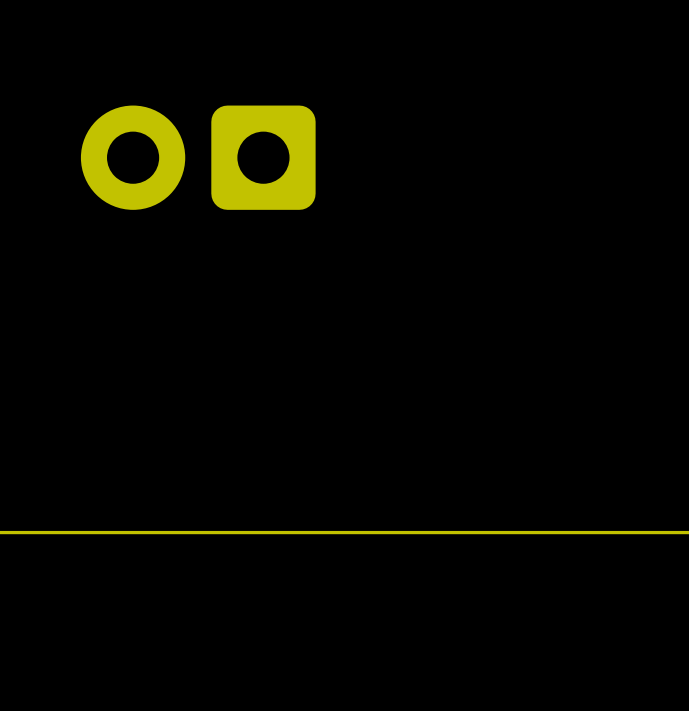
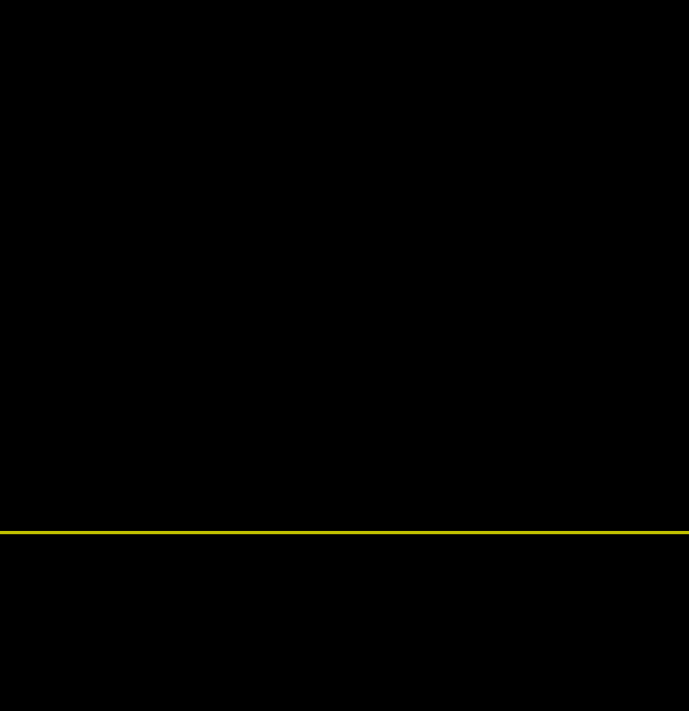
part: (198, 157) -> none

